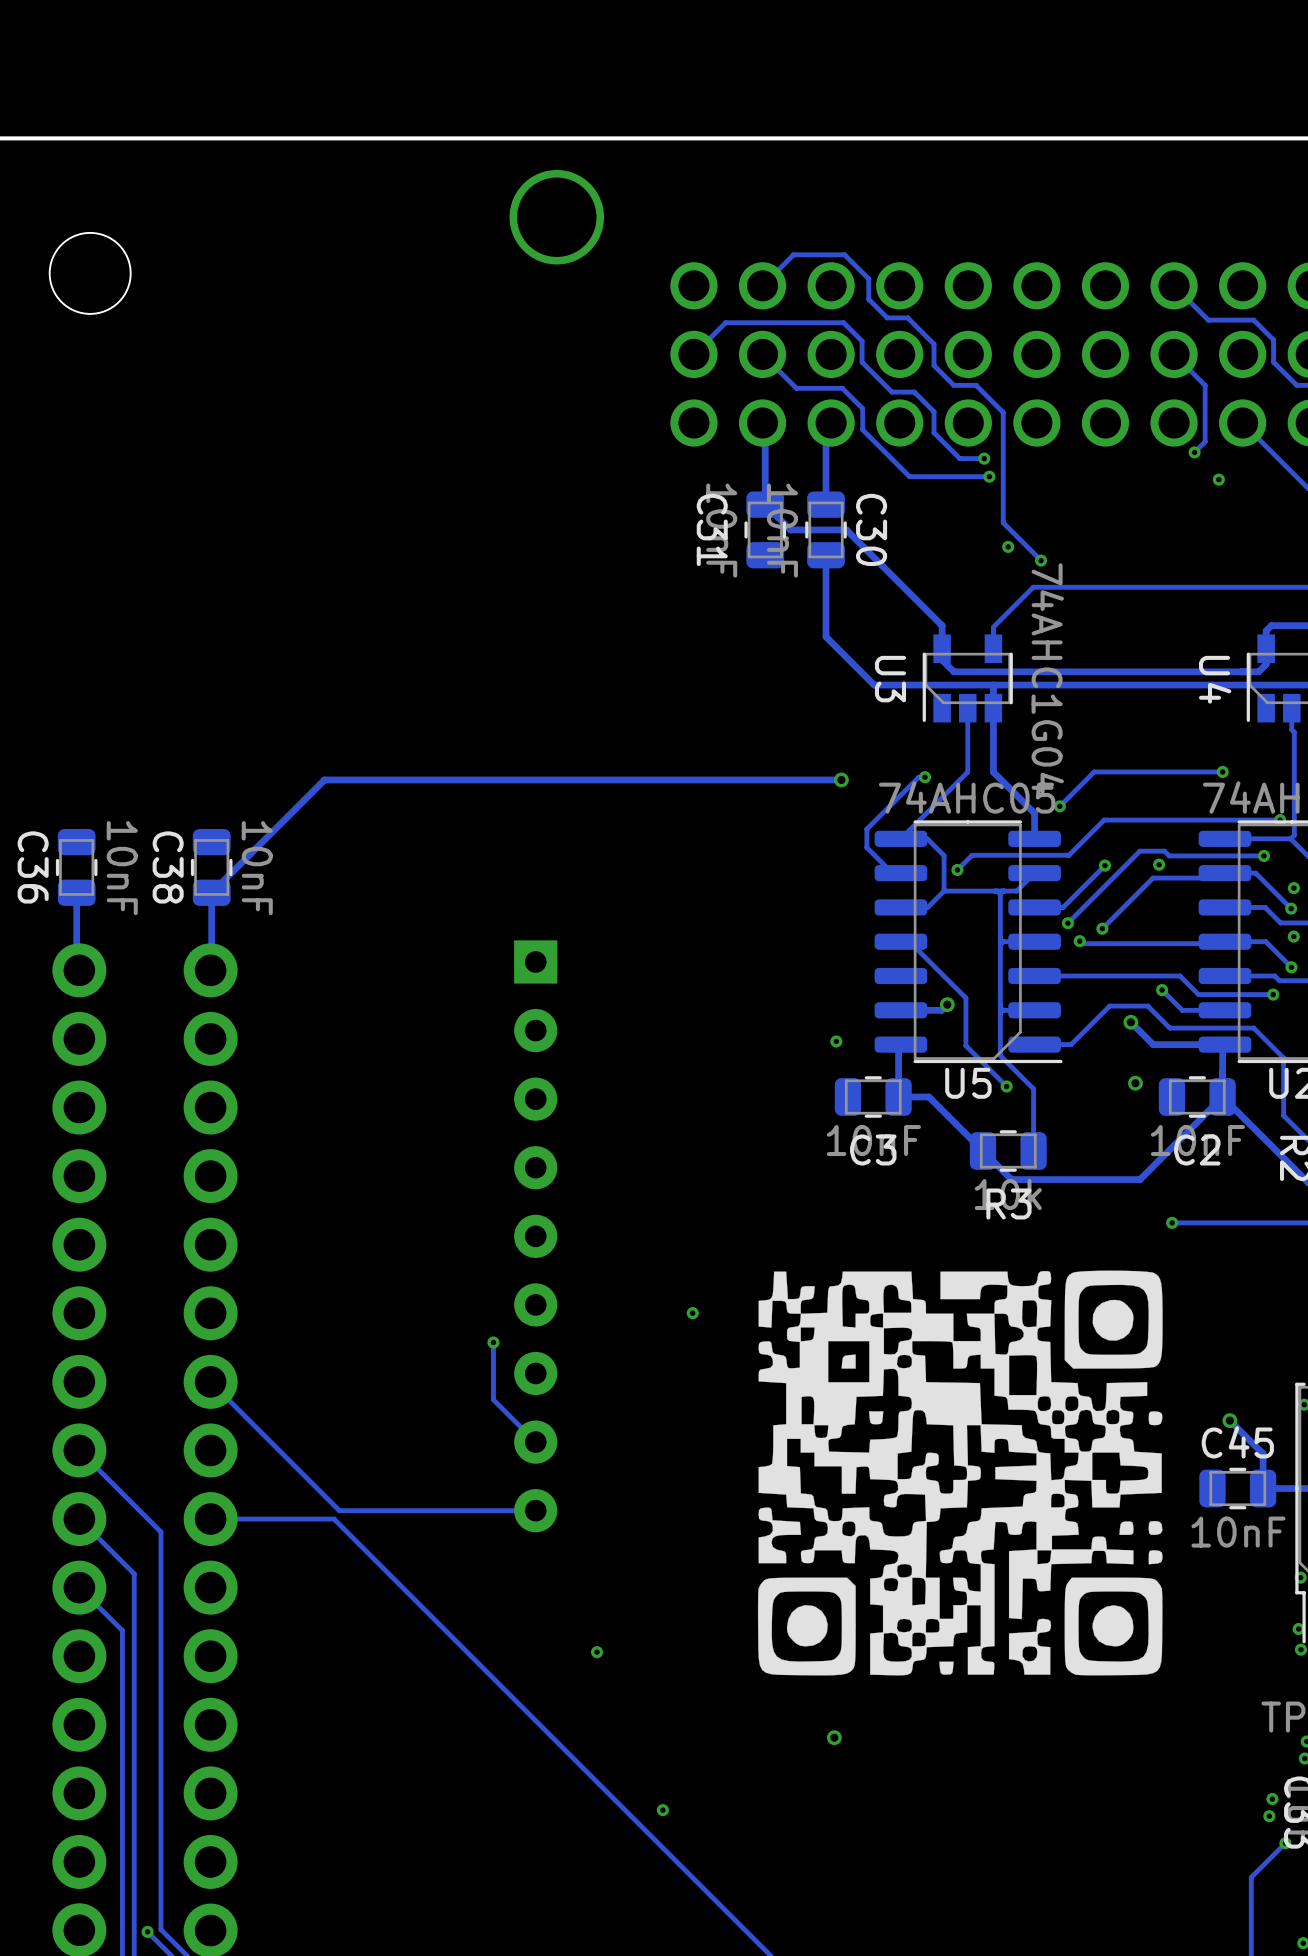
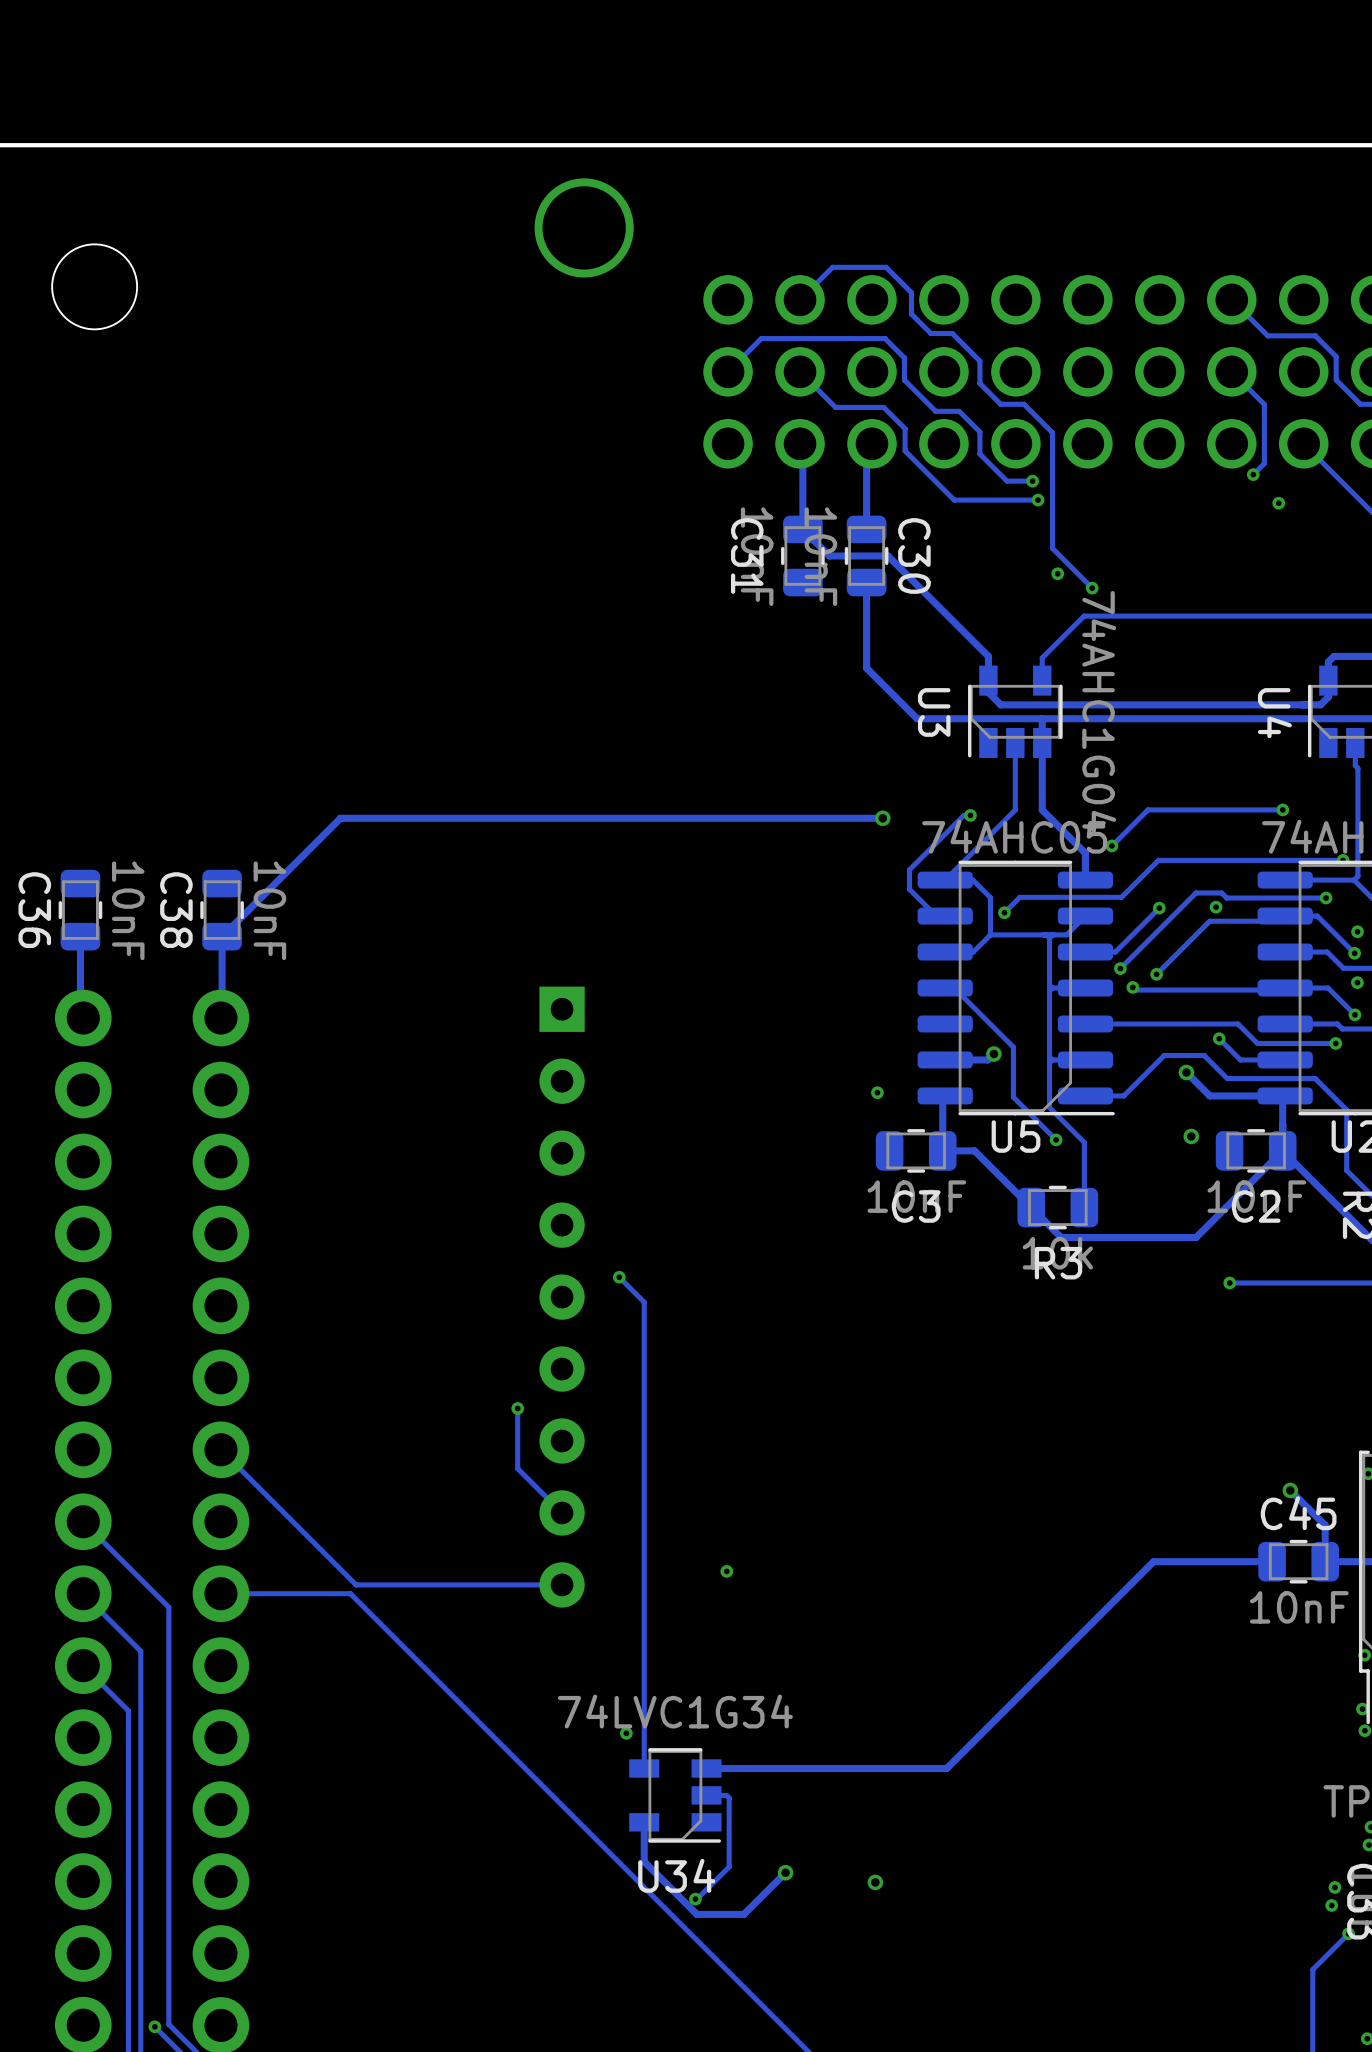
track: none -> (619, 1277) (644, 1302) (644, 1768)
via: none -> (619, 1277)
drawing: [757, 1270, 1163, 1676] -> none
via: (692, 1313) -> none
track: none -> (1272, 1561) (1153, 1561) (946, 1768) (706, 1768)
via: none -> (726, 1571)
U34: none -> 74LVC1G34 (675, 1795)
track: none -> (706, 1795) (726, 1795) (729, 1797) (729, 1866) (700, 1895)
track: none -> (644, 1822) (644, 1861) (696, 1914) (743, 1914) (785, 1872)
via: (834, 1737) -> none
via: none -> (785, 1872)
via: none -> (875, 1882)

